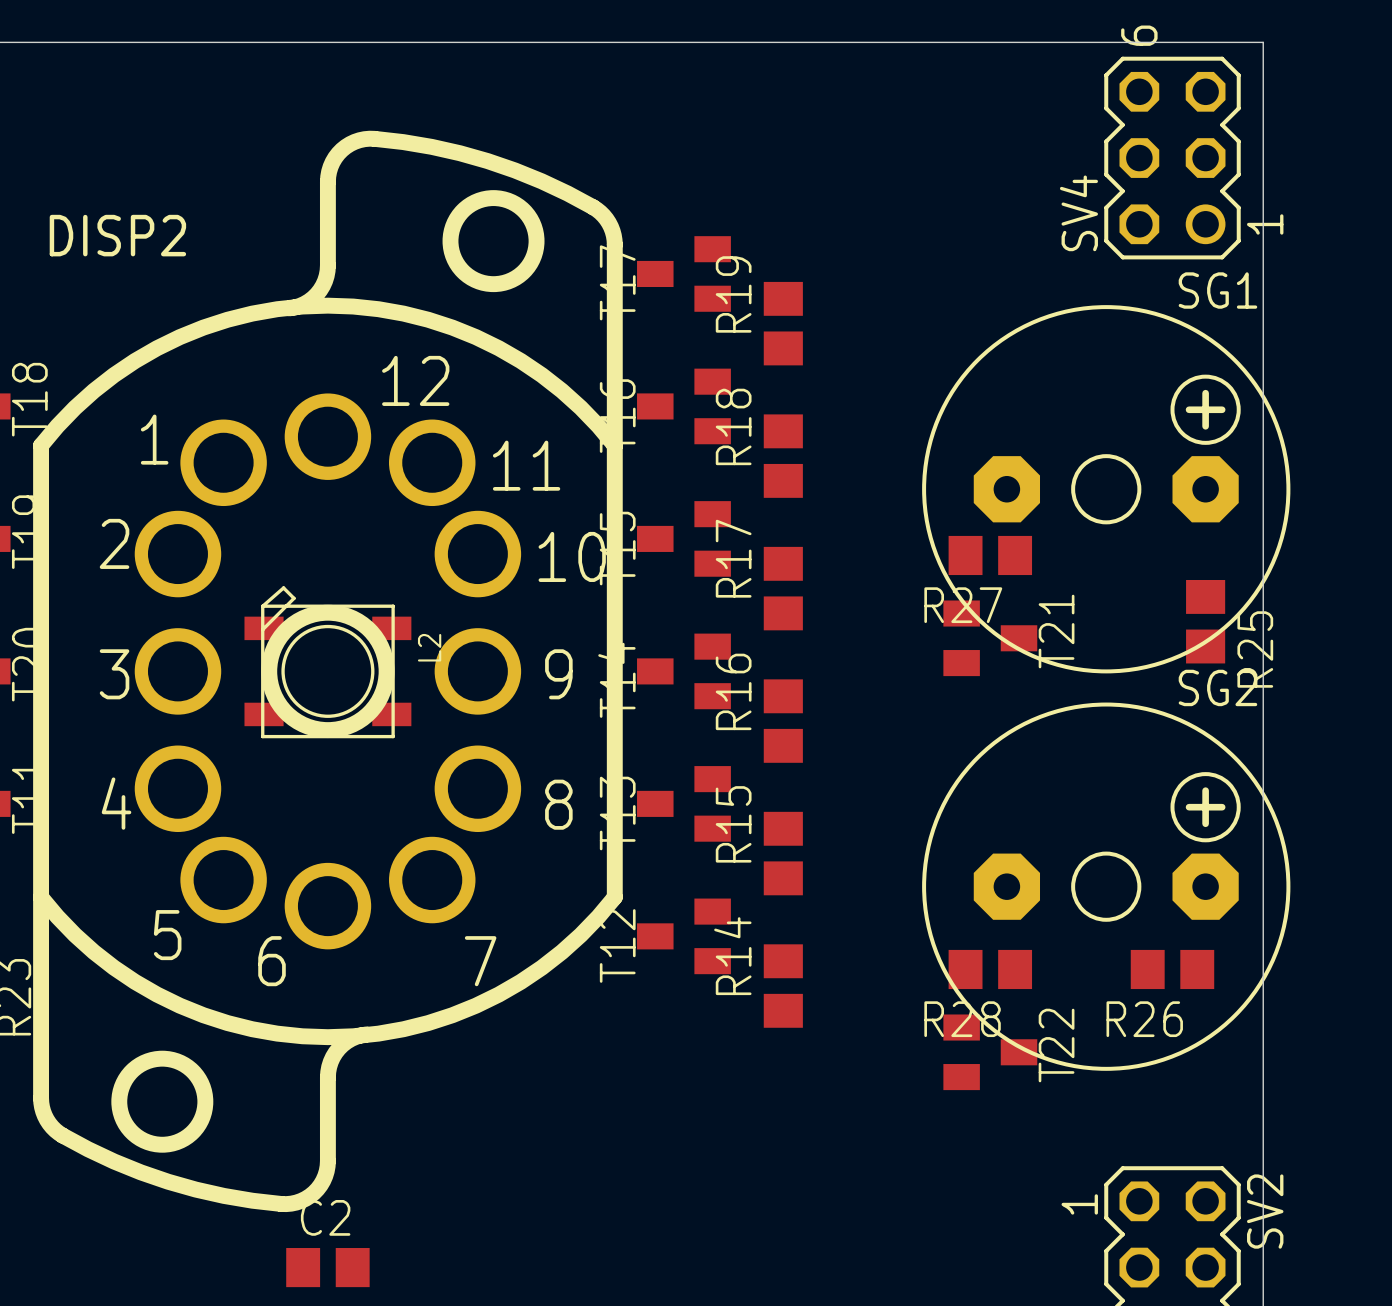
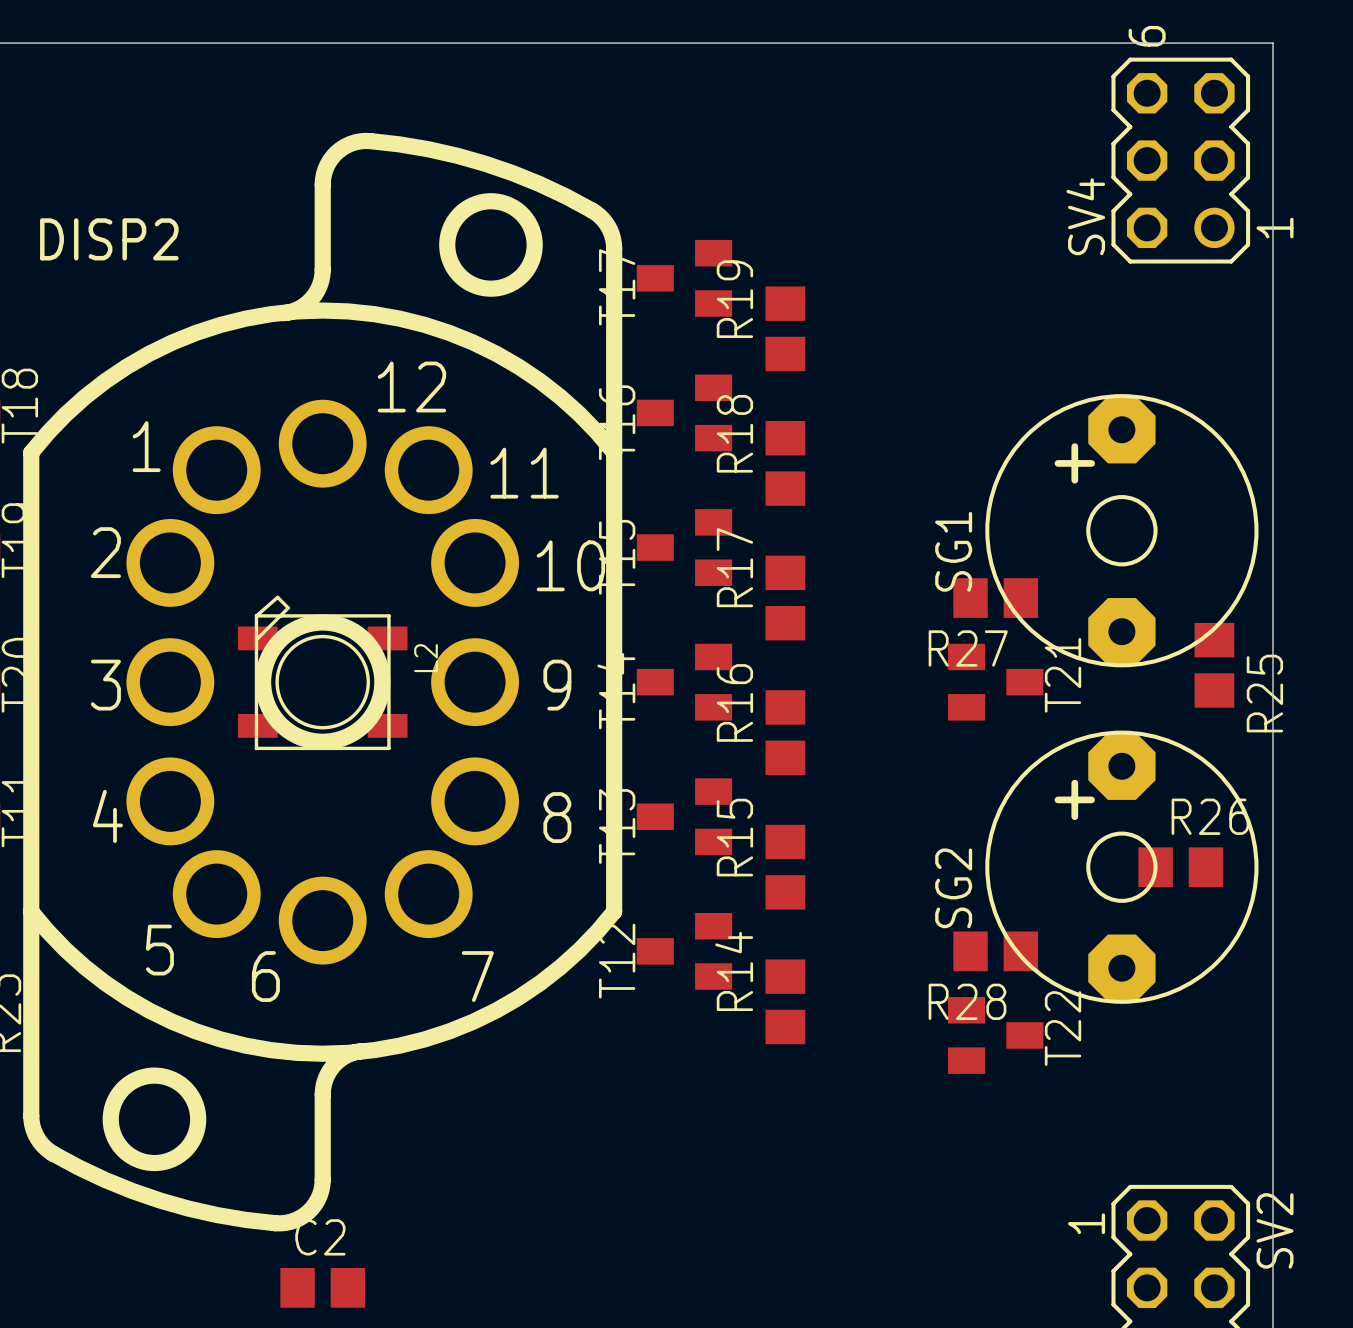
SG1 name position: SG1 (1217, 290) -> SG1 (953, 551)
SG1 footprint: [922, 305, 1291, 674] -> [985, 394, 1259, 668]
R27 position: (990, 555) -> (995, 598)
R25 position: (1205, 621) -> (1214, 665)
T21 position: (990, 638) -> (995, 682)
SG2 name position: SG2 (1217, 687) -> SG2 (953, 888)
SG2 footprint: [922, 702, 1291, 1071] -> [985, 730, 1259, 1004]
R28 position: (990, 969) -> (995, 951)
R26 position: (1172, 969) -> (1180, 867)
R26 name position: R26 (1144, 1019) -> R26 (1210, 816)
T22 position: (990, 1052) -> (995, 1035)

